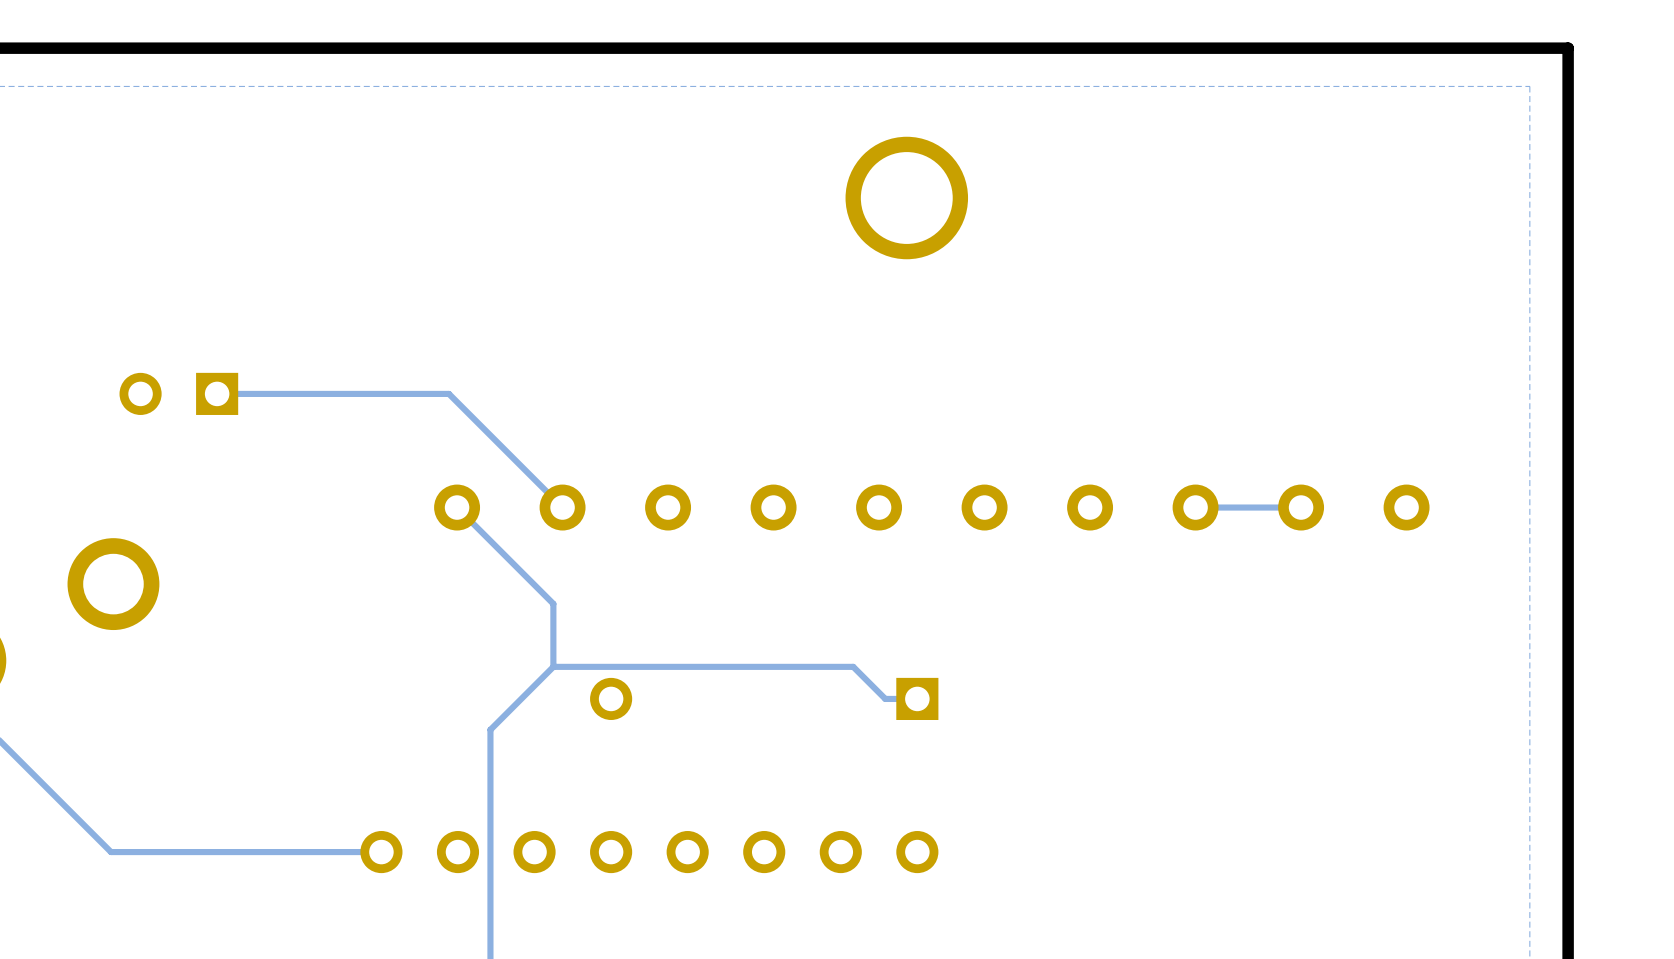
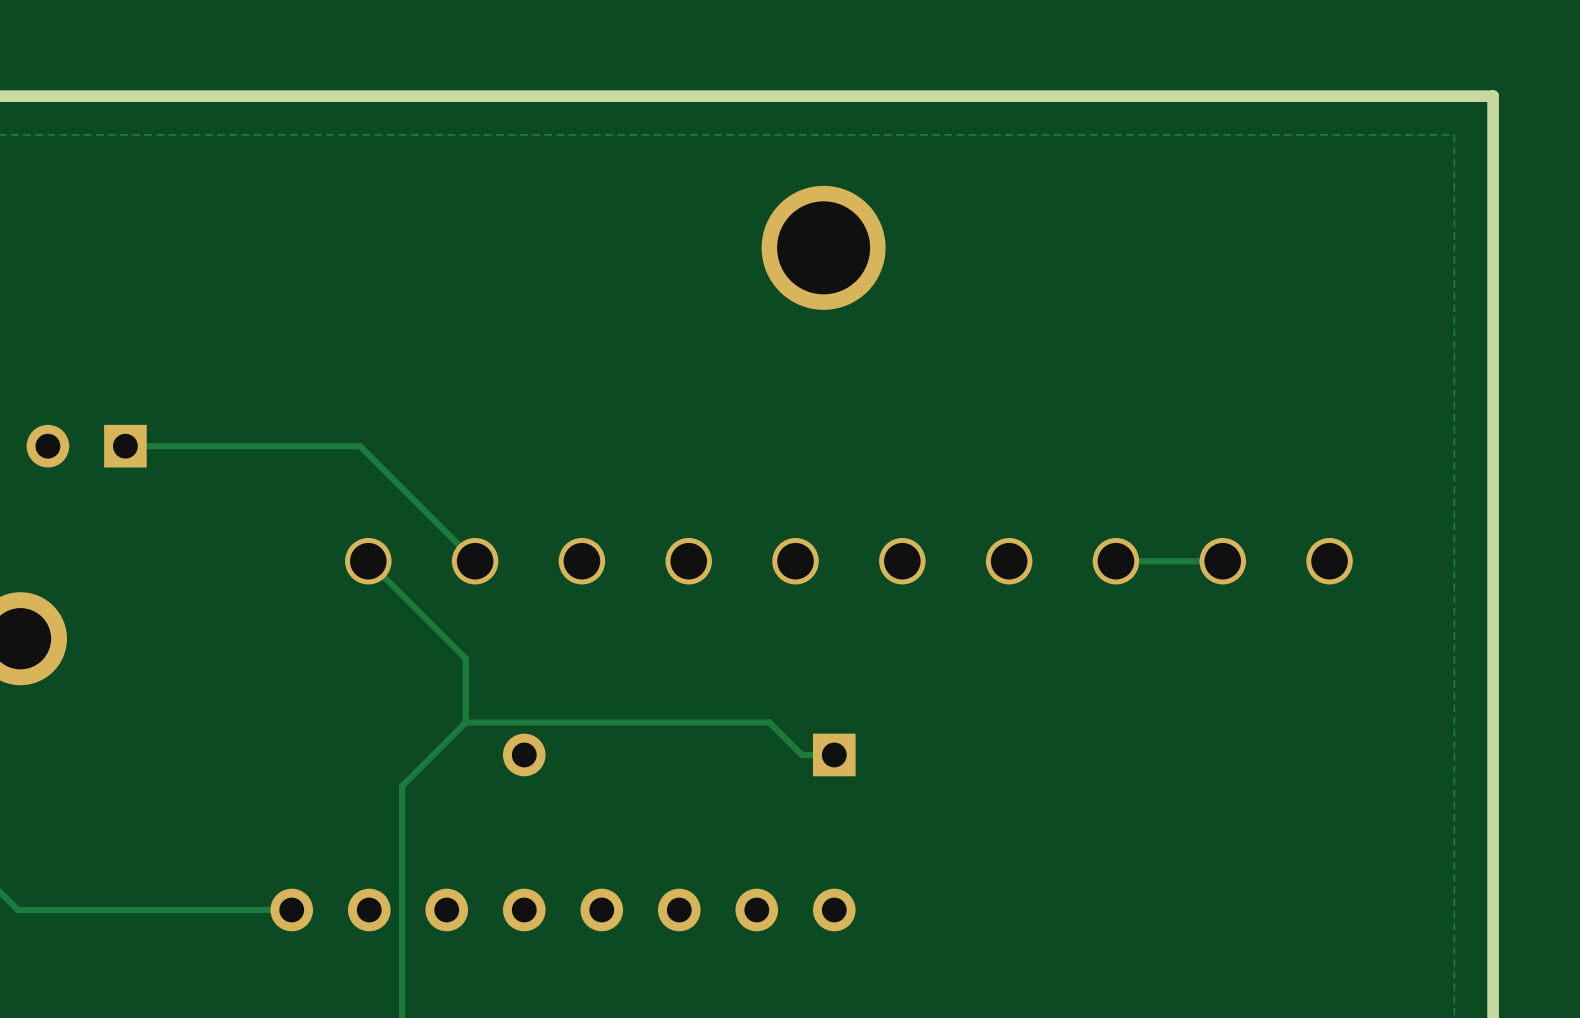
part footprint: [434, 484, 1430, 531] -> [345, 537, 1353, 585]

